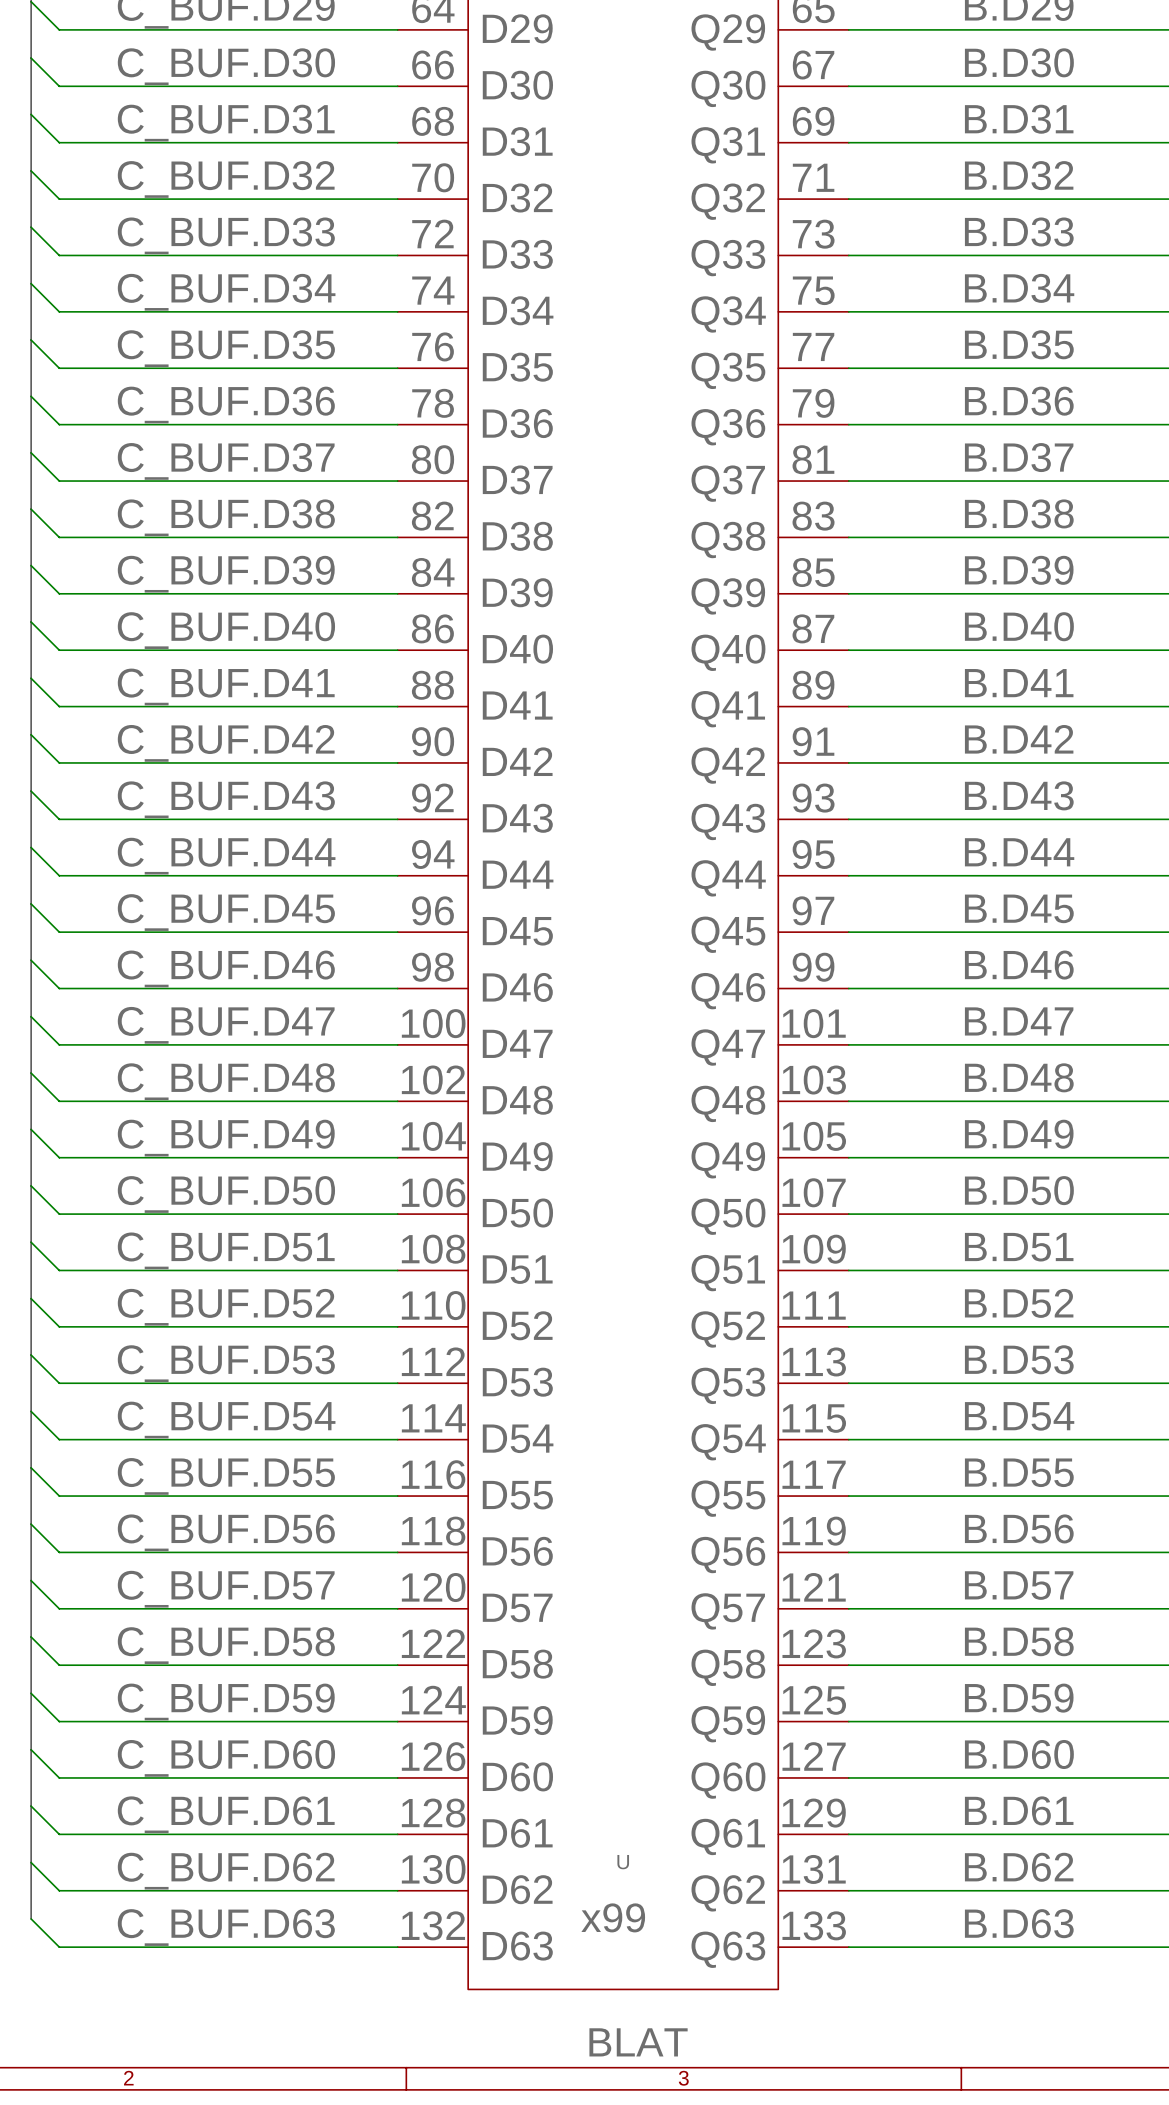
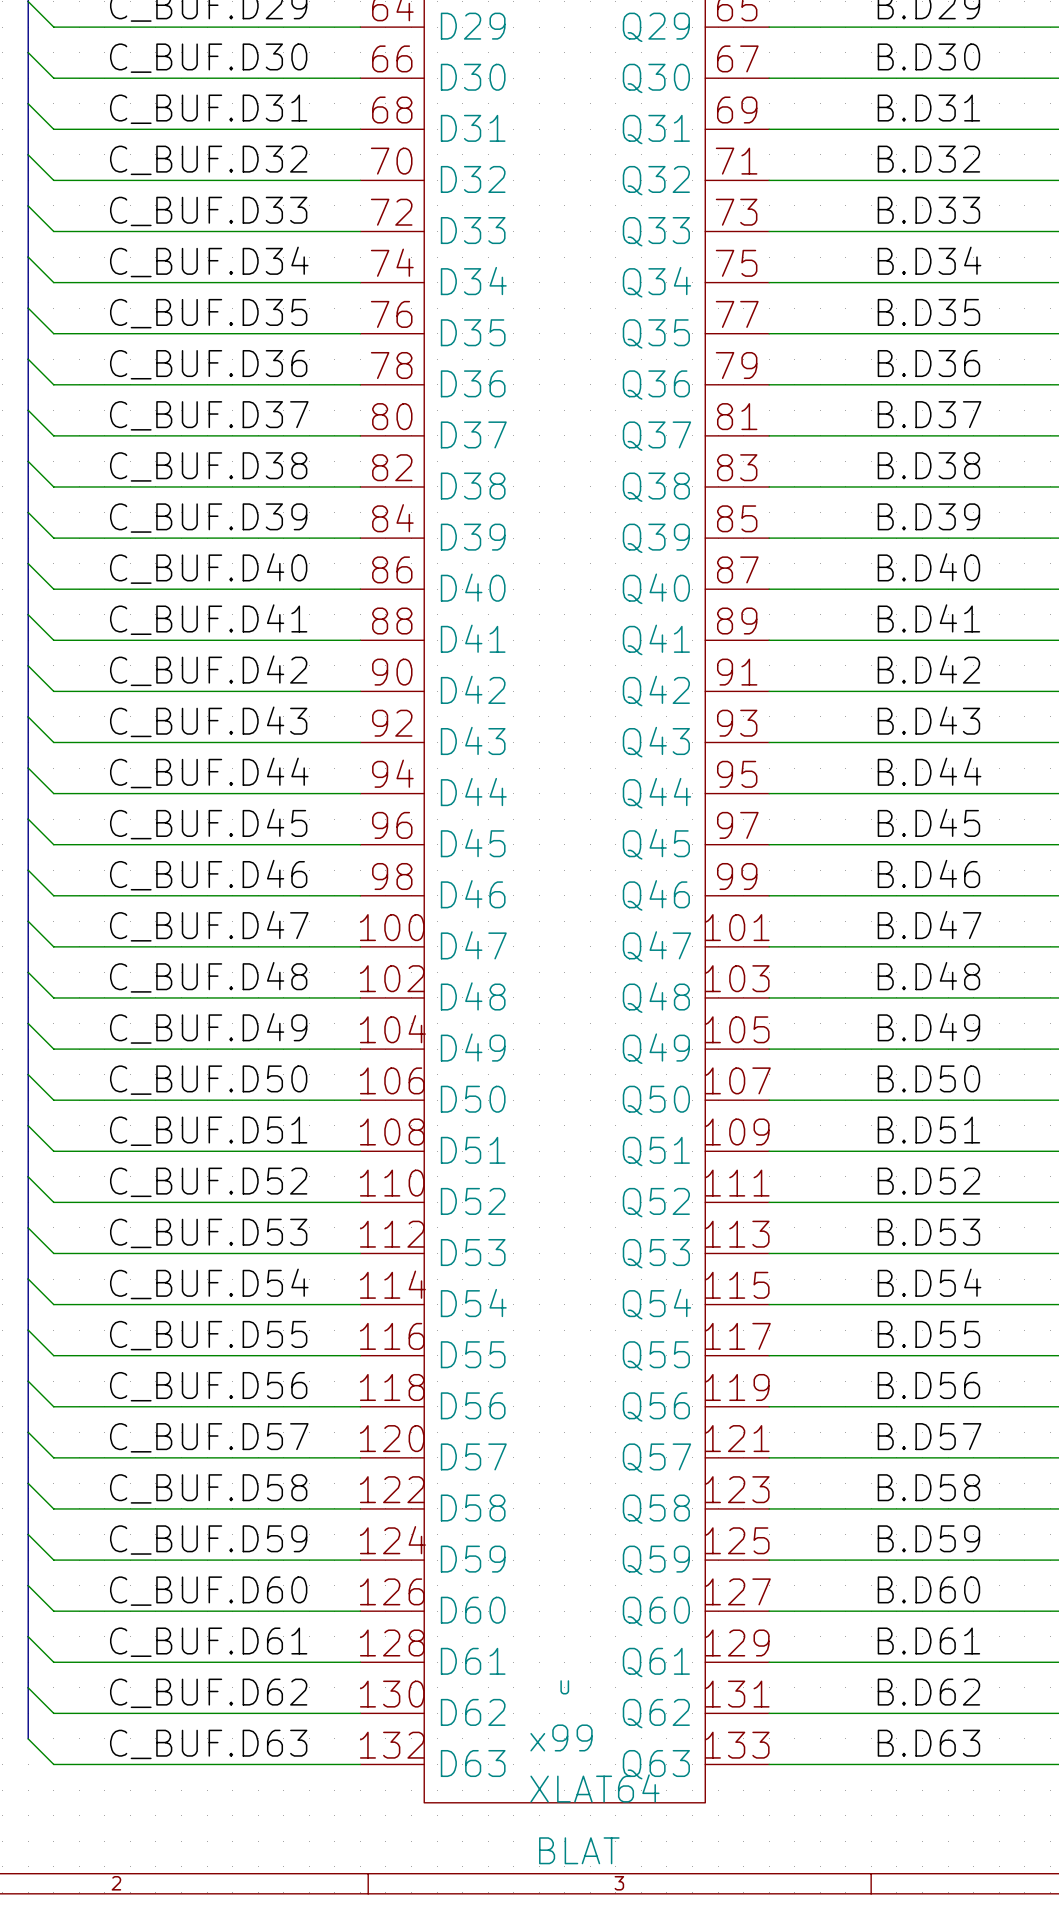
U value: none -> XLAT64 (594, 1788)

